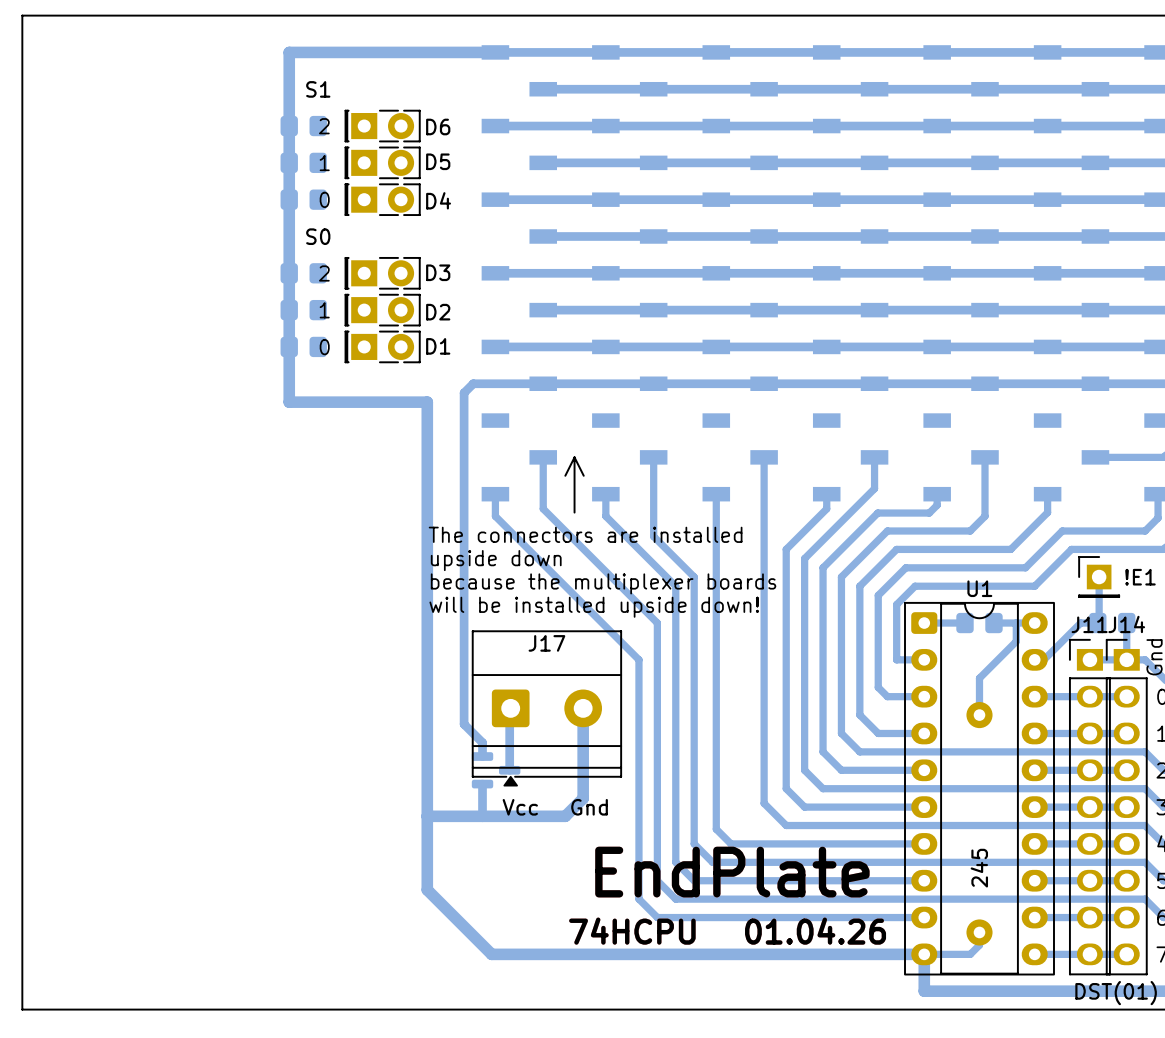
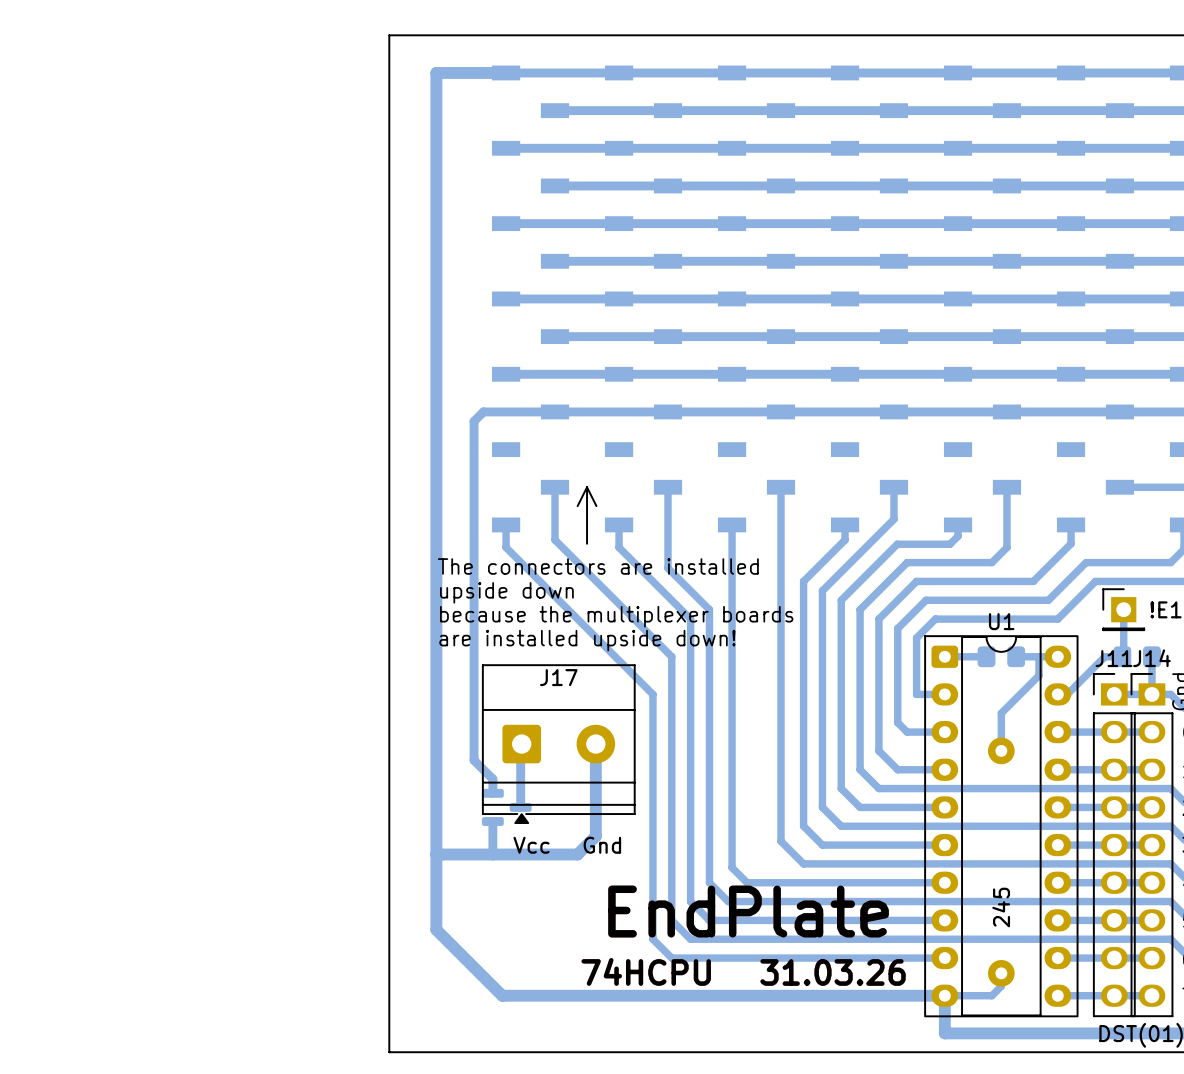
board edge: (381, 15) (22, 15) (22, 1009) (381, 1009) -> (389, 35) (389, 1052)
bottom track: (427, 52) (289, 52) (289, 402) (427, 402) -> (436, 72) (436, 430)
text: S1 (318, 89) -> none
part: (303, 126) -> none
text: 2 (324, 126) -> none
D6: (382, 126) -> none
part: (303, 162) -> none
D5: (382, 162) -> none
text: 1 (324, 163) -> none
part: (303, 199) -> none
text: 0 (324, 199) -> none
D4: (382, 199) -> none
text: S0 (318, 236) -> none
part: (303, 273) -> none
text: 2 (324, 273) -> none
D3: (382, 273) -> none
part: (303, 310) -> none
text: 1 (324, 310) -> none
D2: (382, 310) -> none
part: (303, 346) -> none
D1: (382, 346) -> none
text: 0 (324, 347) -> none
text: will be installed upside down! (594, 607) -> are installed upside down! (587, 640)
text: 01.04.26 (815, 931) -> none
text: none -> 31.03.26 (833, 972)

